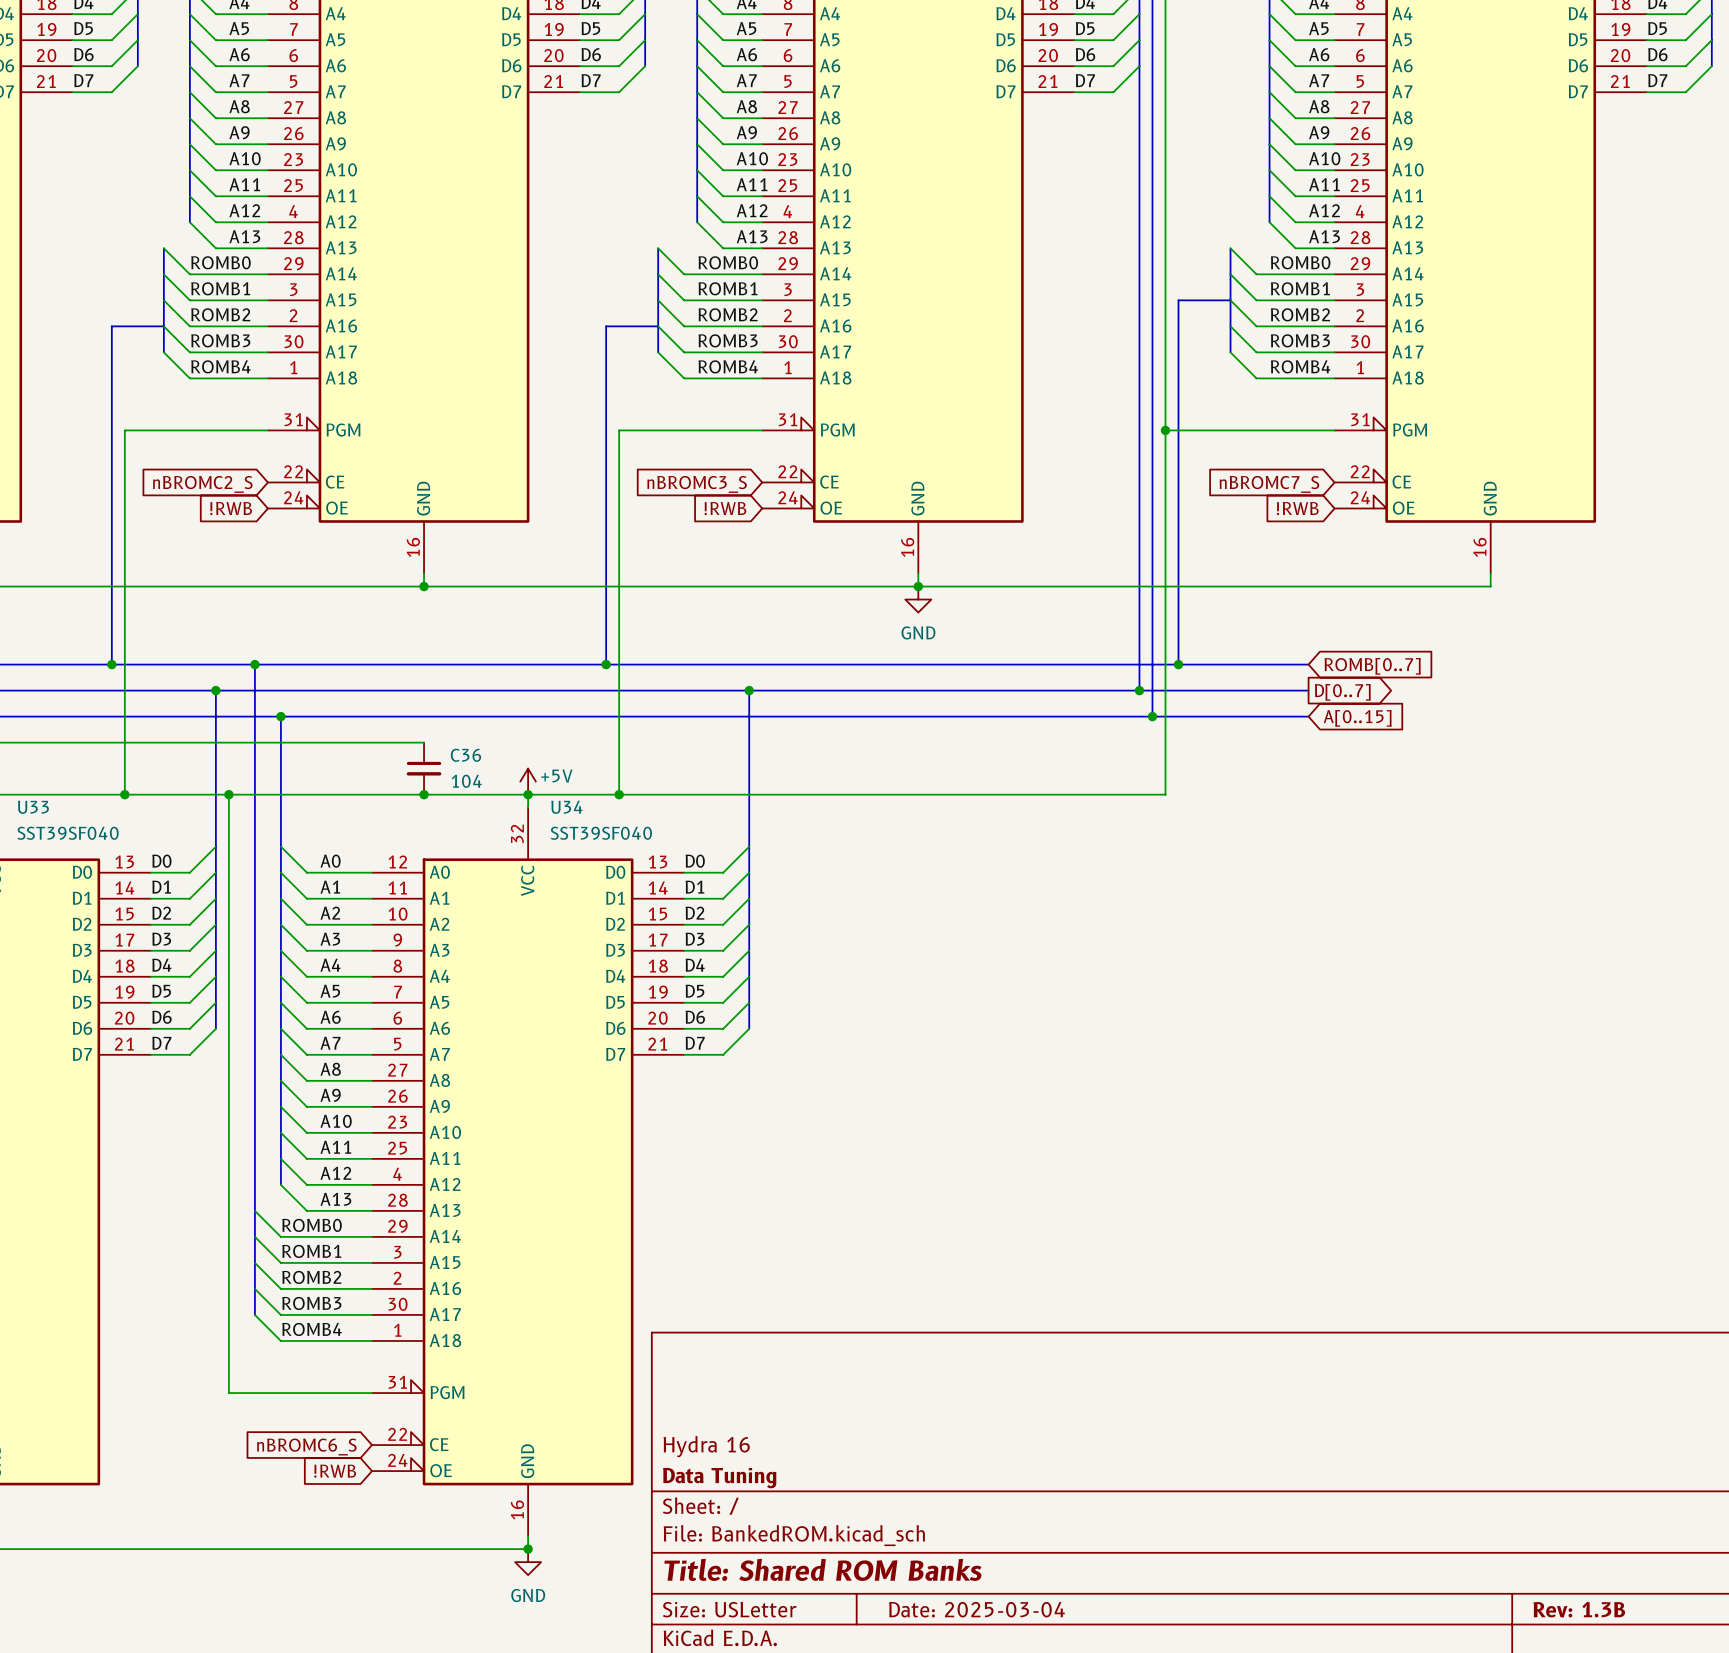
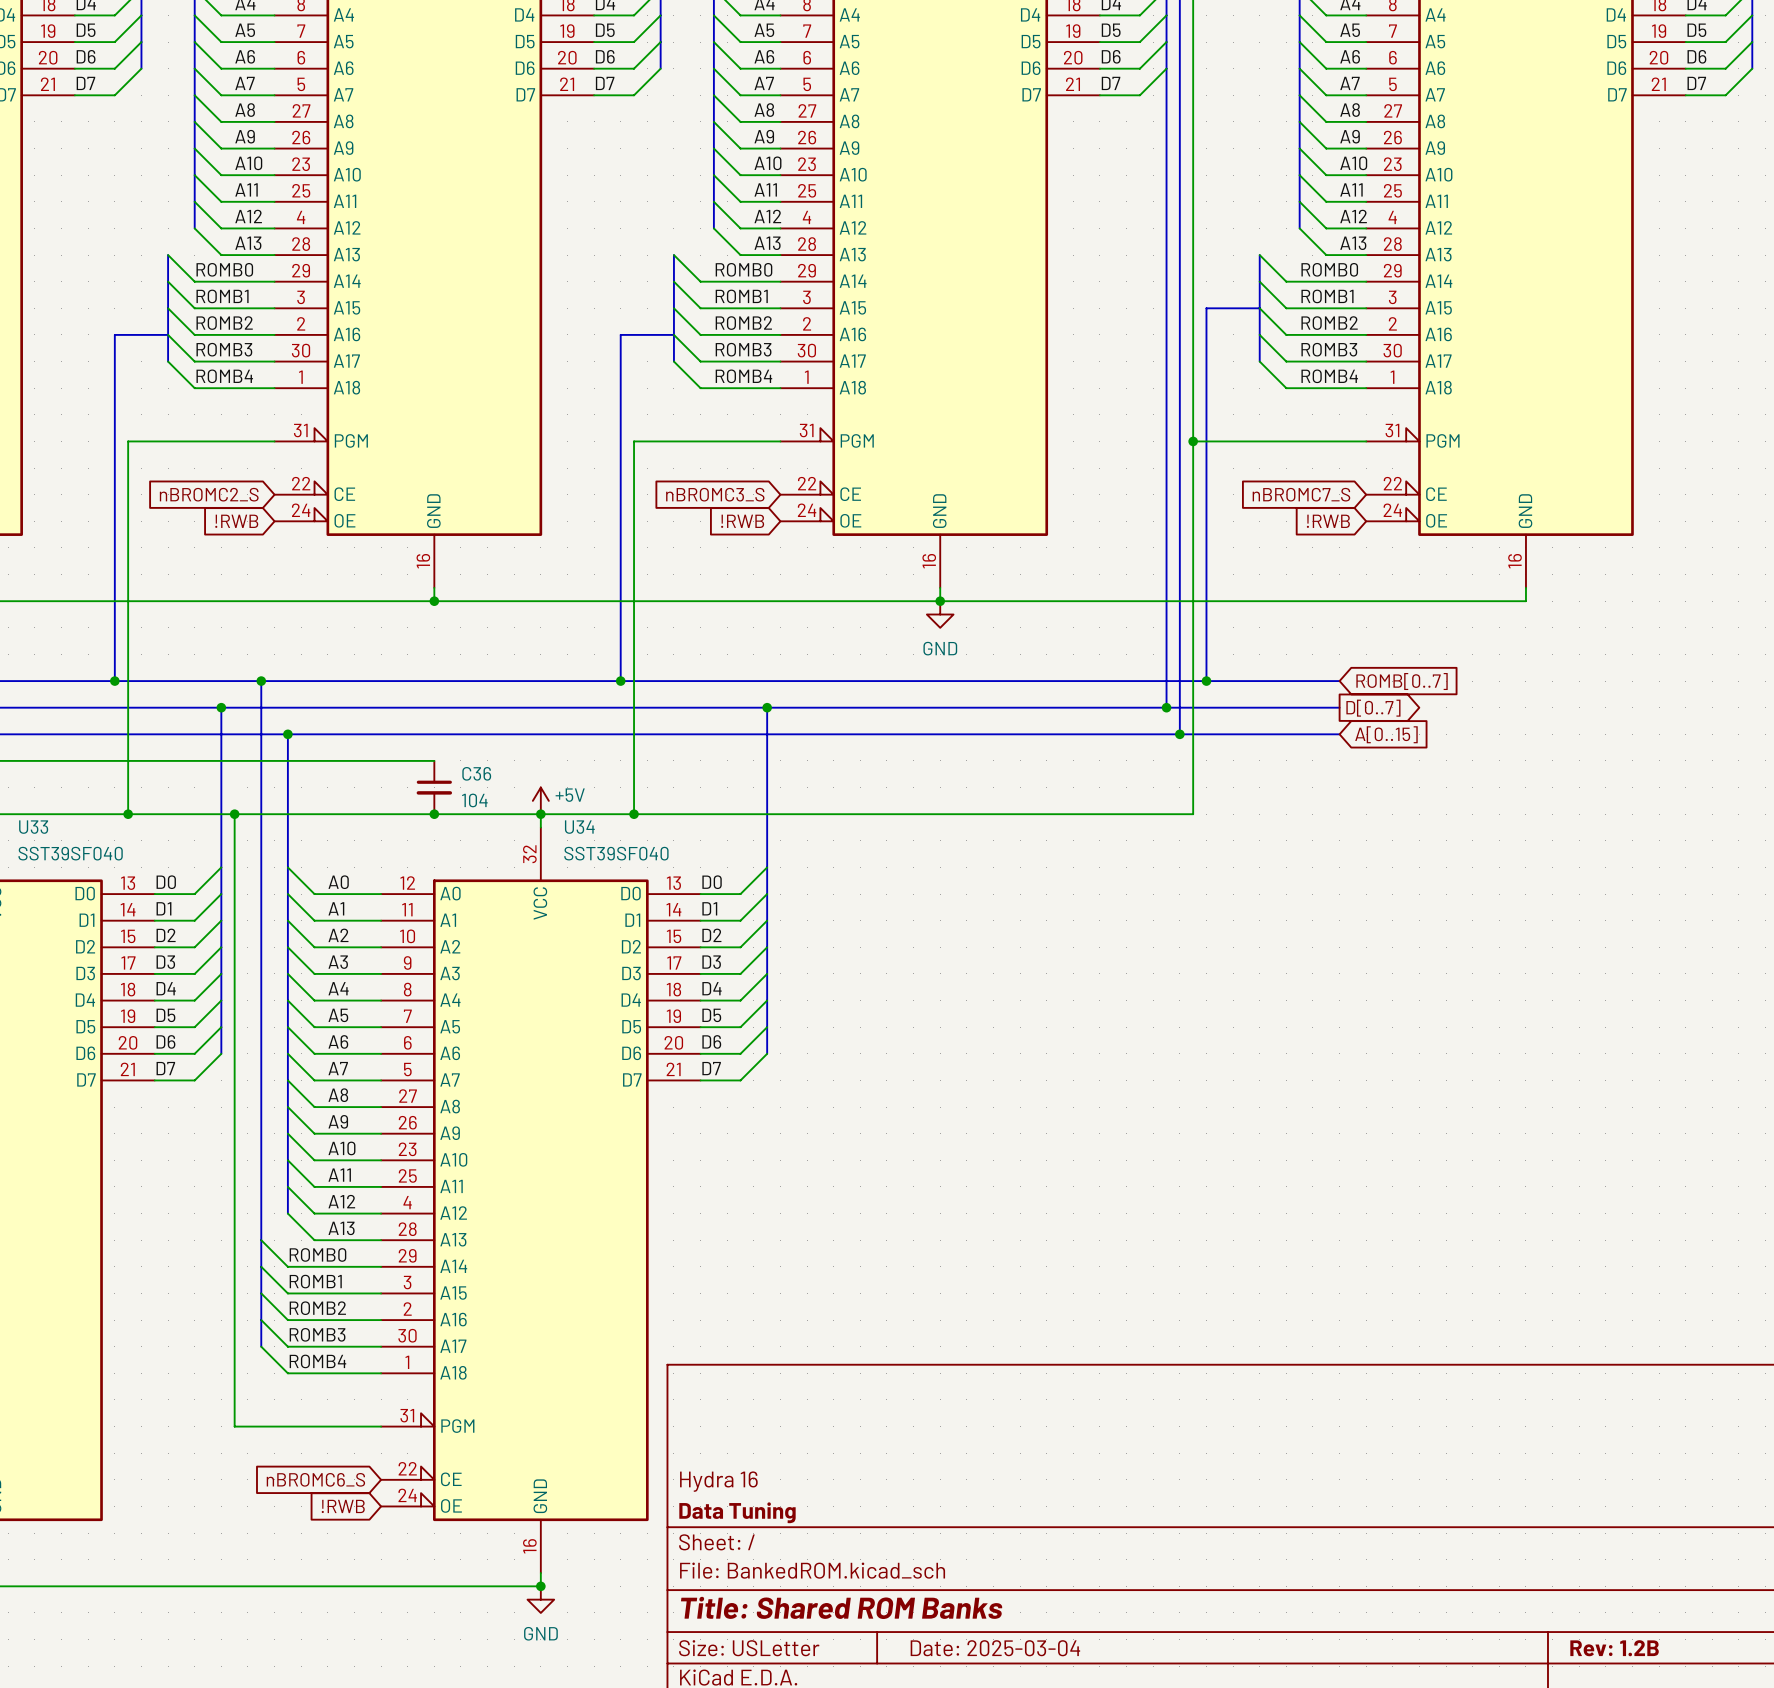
title block: Rev: 1.3B (1579, 1609) -> Rev: 1.2B (1614, 1648)

